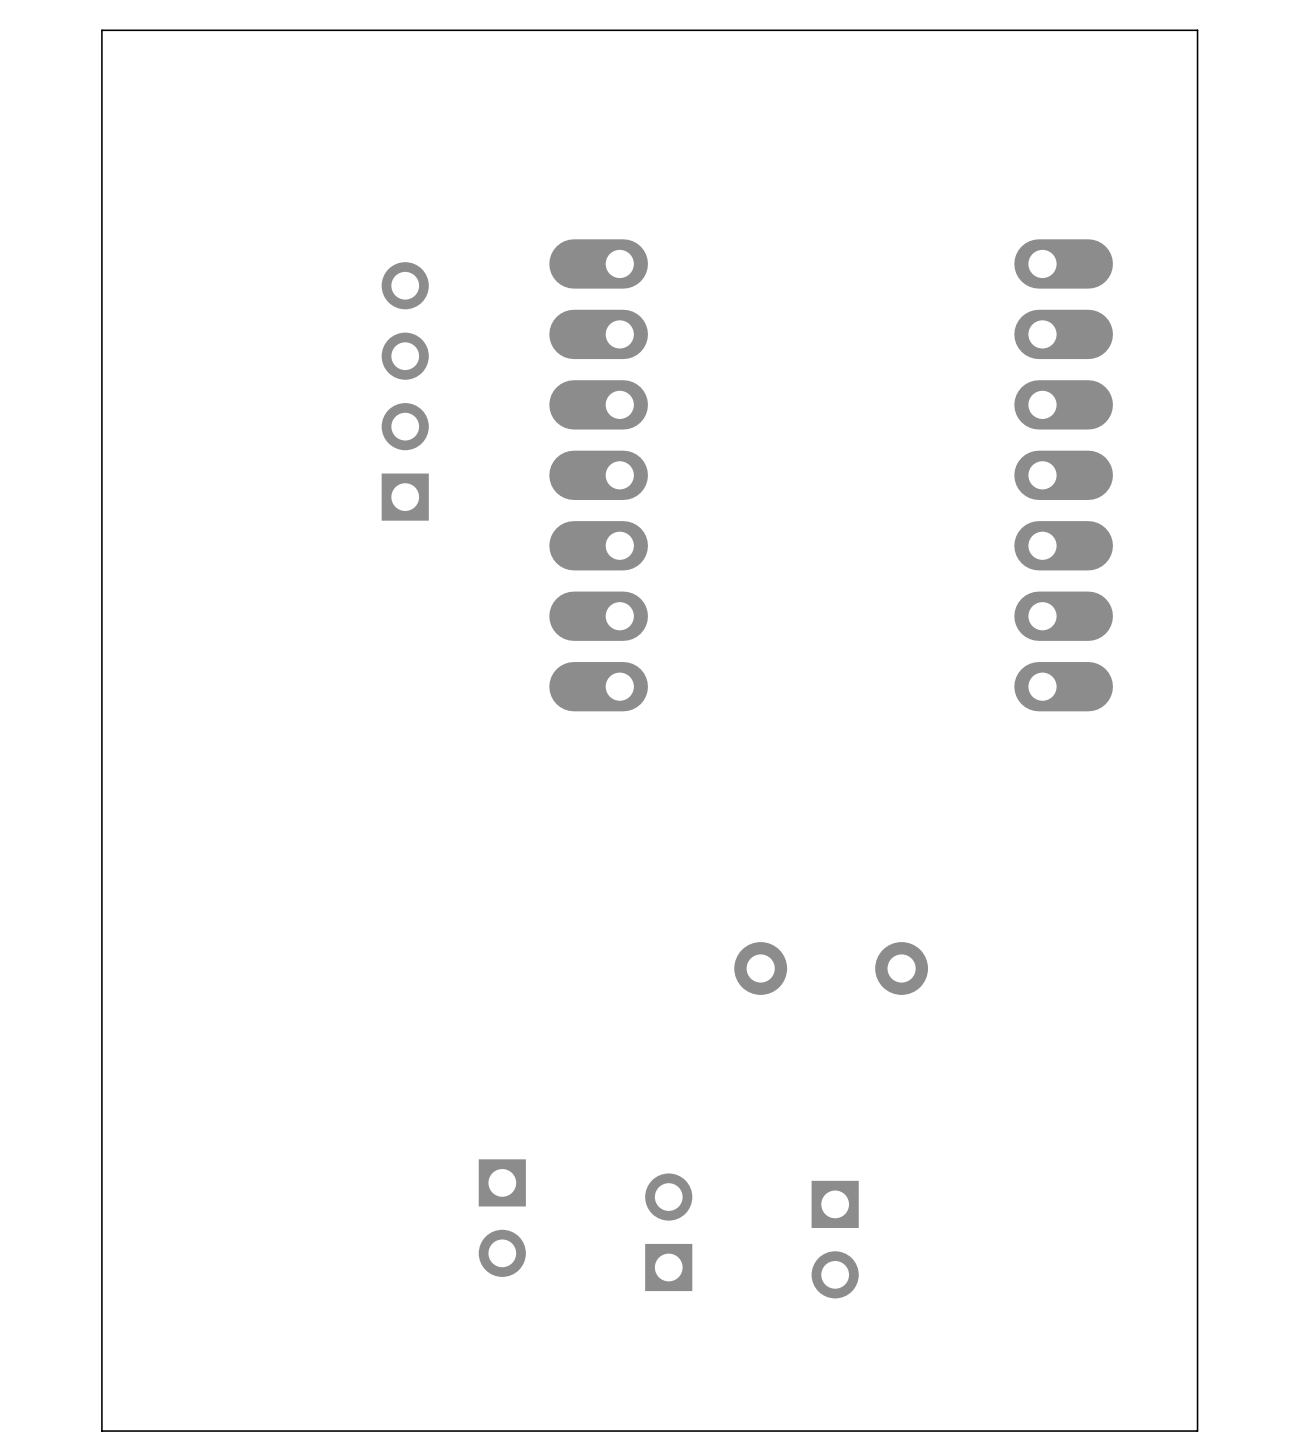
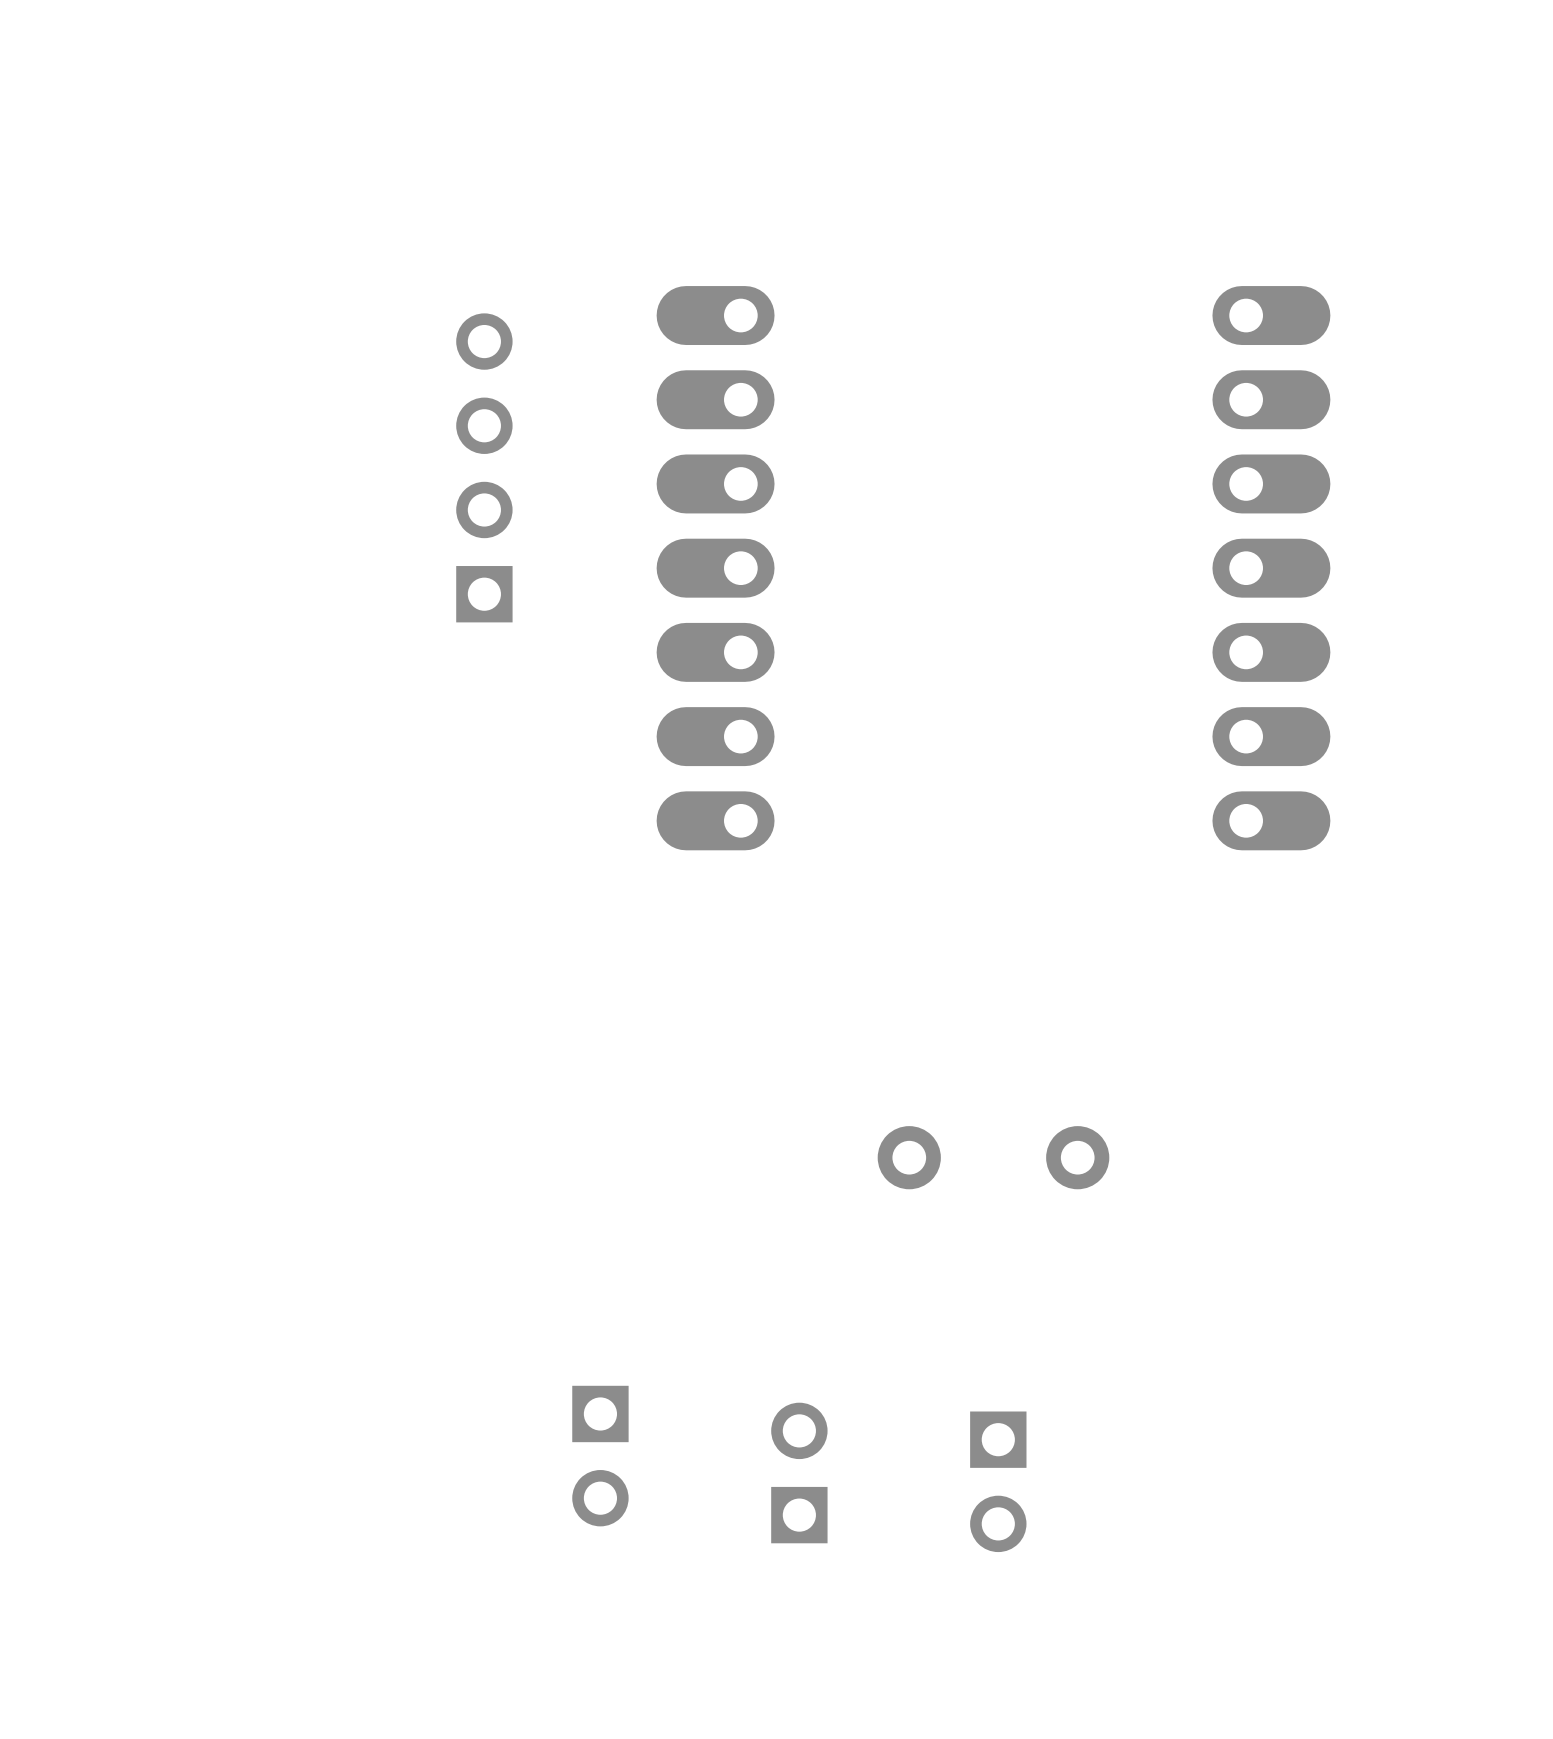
board edge: (1197, 30) (101, 30) (101, 1431) (1197, 1431) (1197, 30) -> none

